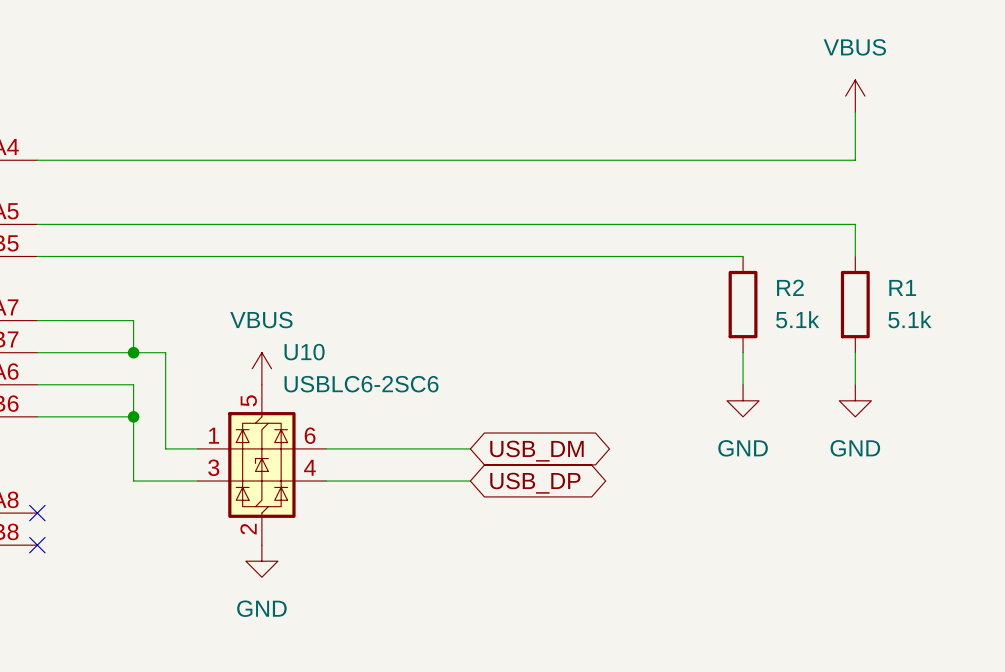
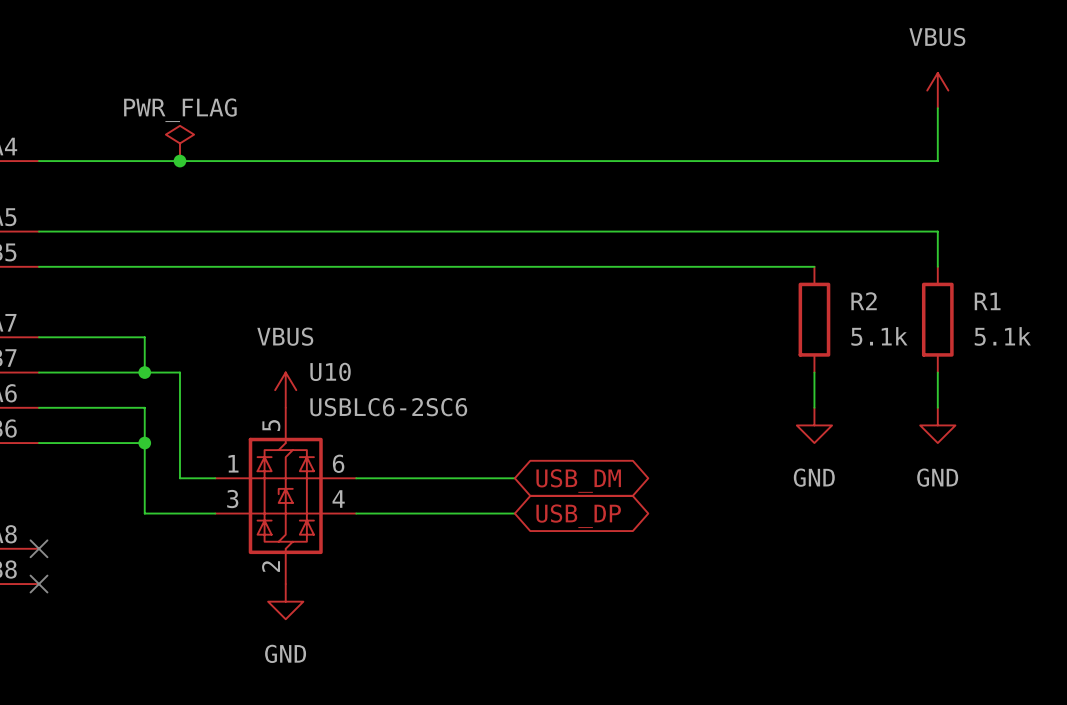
power symbol: none -> PWR_FLAG (179, 143)
junction: none -> (179, 161)

